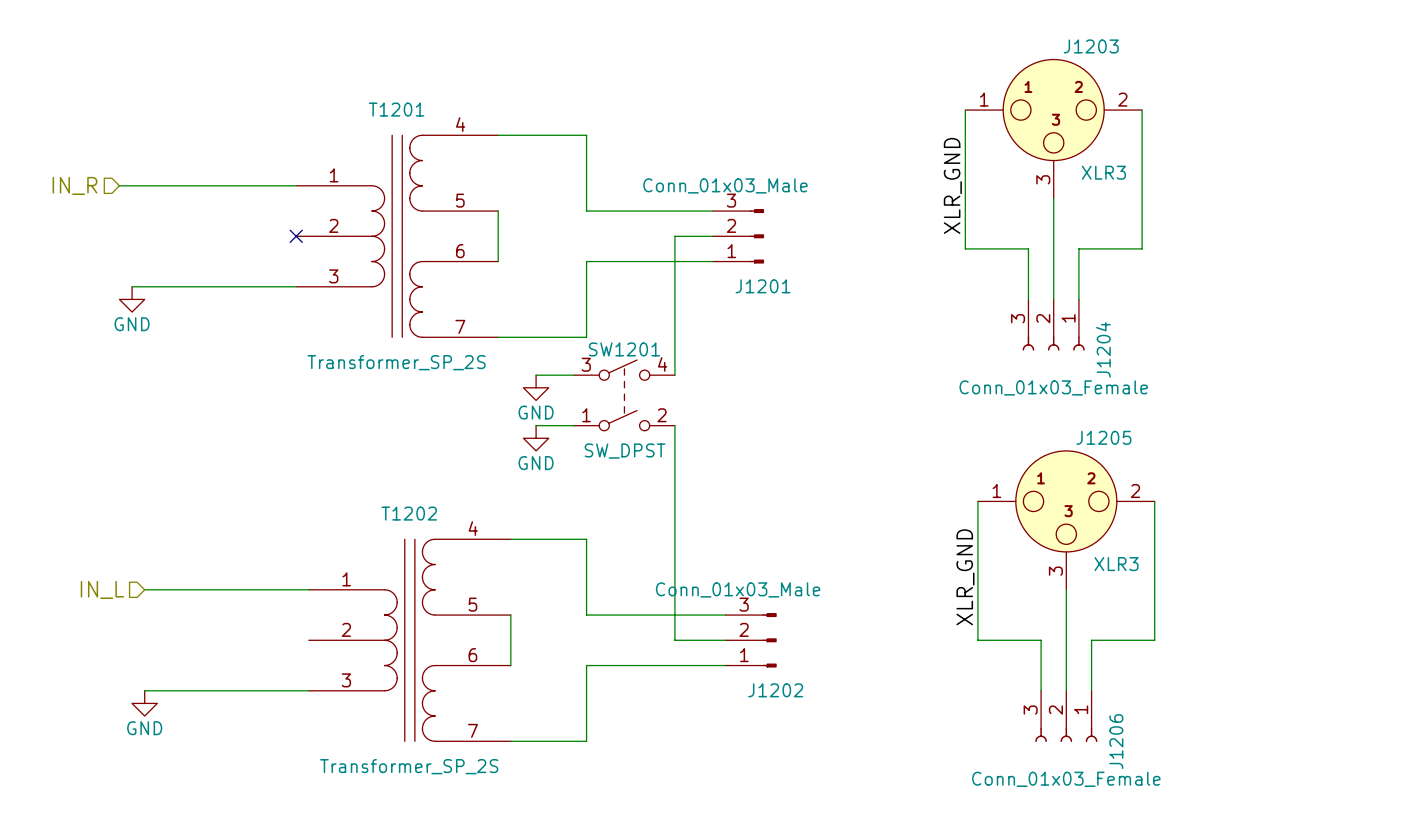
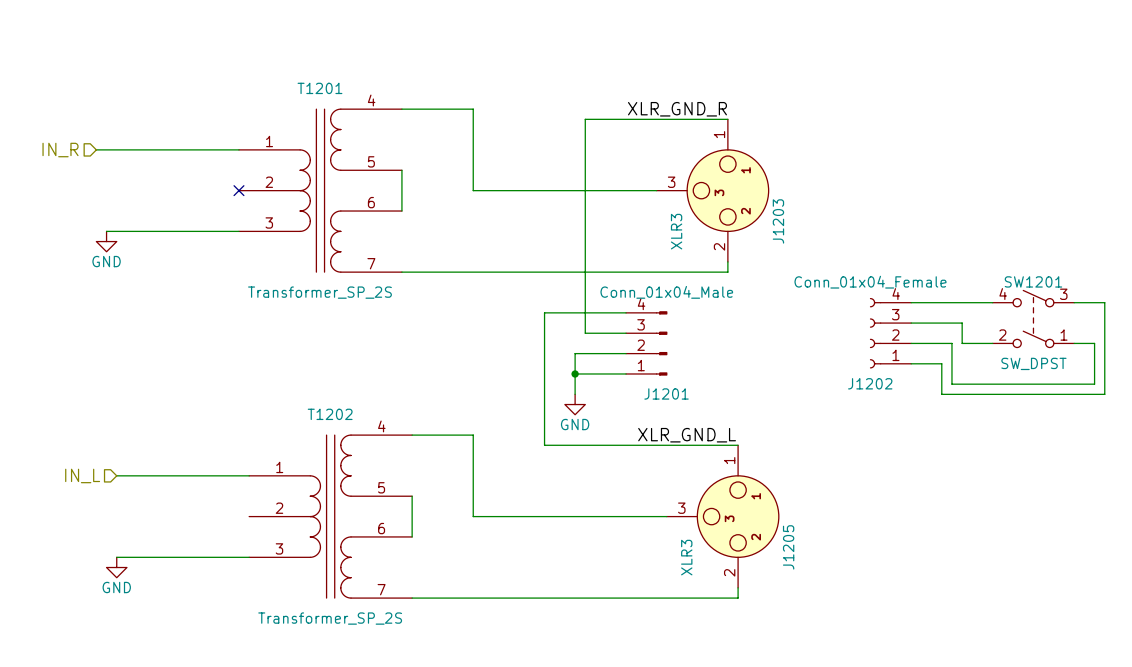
wire: (965, 110) (965, 248) (1028, 248) (1028, 299) -> none
J1203 rotation: 0° (1053, 110) -> 90° clockwise (727, 190)
wire: (1142, 110) (1142, 248) (1078, 248) (1078, 299) -> none
J1203 position: (1053, 128) -> (712, 190)
label: none -> XLR_GND_R (677, 109)
wire: none -> (727, 119) (585, 119) (585, 333) (626, 333)
J1201 value: Conn_01x03_Male (725, 185) -> Conn_01x04_Male (666, 292)
label: XLR_GND (952, 185) -> none
wire: (1053, 198) (1053, 299) -> none
J1201 symbol: [712, 209, 765, 264] -> [626, 311, 668, 376]
wire: (586, 211) (712, 211) -> (473, 170) (473, 190) (544, 190)
wire: (674, 236) (674, 375) -> none
wire: none -> (575, 190) (656, 190)
wire: (712, 261) (586, 261) (586, 337) -> (727, 261) (727, 272) (473, 272)
J1204: Conn_01x03_Female (1053, 325) -> none
wire: (536, 375) (573, 375) -> none
wire: none -> (911, 302) (992, 302)
wire: none -> (1074, 302) (1104, 302) (1104, 394) (941, 394) (941, 363) (911, 363)
power symbol: GND (536, 387) -> none
wire: none -> (626, 312) (544, 312) (544, 343)
SW1201 flip: as is (624, 395) -> left-right (1033, 318)
SW1201 position: (624, 395) -> (1033, 318)
wire: none -> (911, 323) (962, 323) (962, 343) (992, 343)
wire: (536, 425) (573, 425) -> none
wire: none -> (911, 343) (951, 343) (951, 384) (1094, 384) (1094, 343) (1074, 343)
power symbol: GND (536, 438) -> none
wire: none -> (626, 353) (575, 353) (575, 394)
wire: none -> (575, 373) (626, 373)
junction: none -> (575, 373)
power symbol: none -> GND (575, 404)
wire: (977, 501) (977, 640) (1041, 640) (1041, 690) -> none
J1205 rotation: 0° (1066, 501) -> 90° clockwise (738, 516)
wire: (1154, 501) (1154, 640) (1091, 640) (1091, 690) -> none
J1205 position: (1066, 520) -> (722, 516)
label: none -> XLR_GND_L (687, 435)
wire: (674, 551) (674, 640) -> (544, 445) (738, 445)
label: XLR_GND (965, 577) -> none
J1202 value: Conn_01x03_Male (738, 589) -> Conn_01x04_Female (870, 282)
wire: (1066, 589) (1066, 690) -> none
J1202 symbol: [725, 613, 777, 668] -> [869, 298, 912, 369]
wire: (586, 615) (725, 615) -> (473, 496) (473, 516) (544, 516)
wire: none -> (585, 516) (666, 516)
wire: (725, 665) (586, 665) (586, 741) -> (738, 587) (738, 598) (473, 598)
J1202 name position: J1202 (775, 690) -> J1202 (870, 383)
J1206: Conn_01x03_Female (1066, 716) -> none

